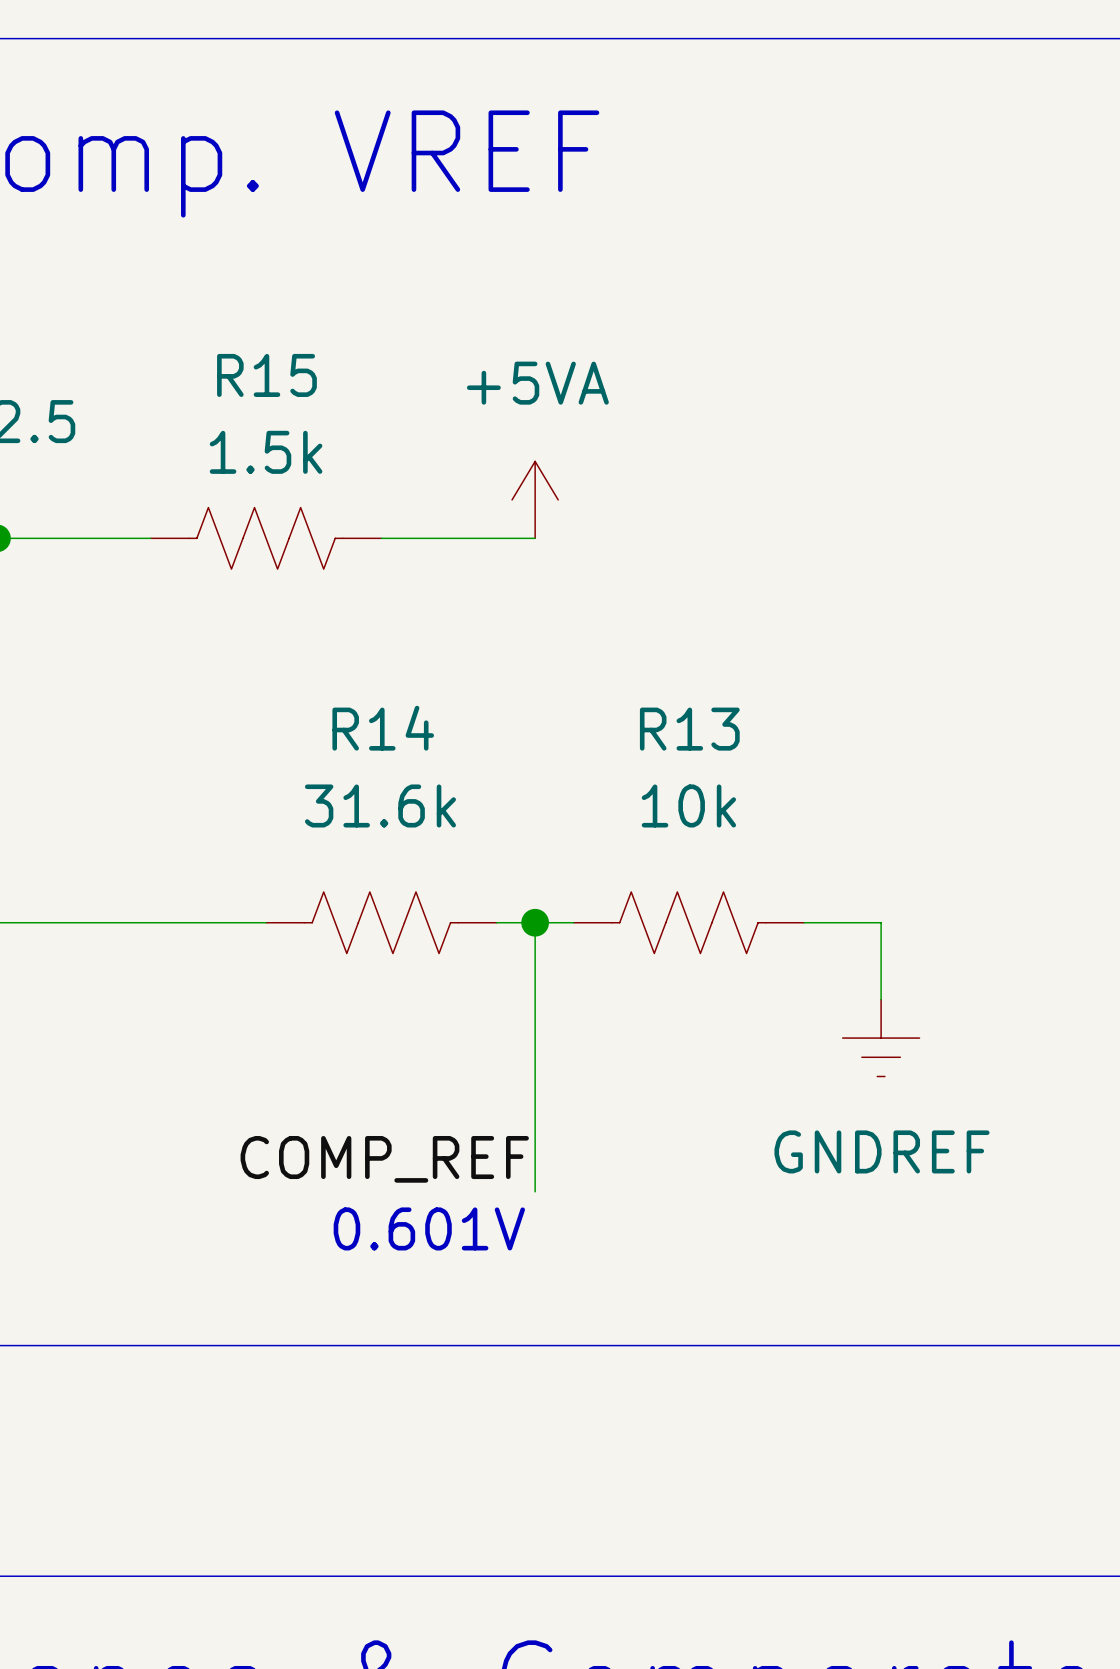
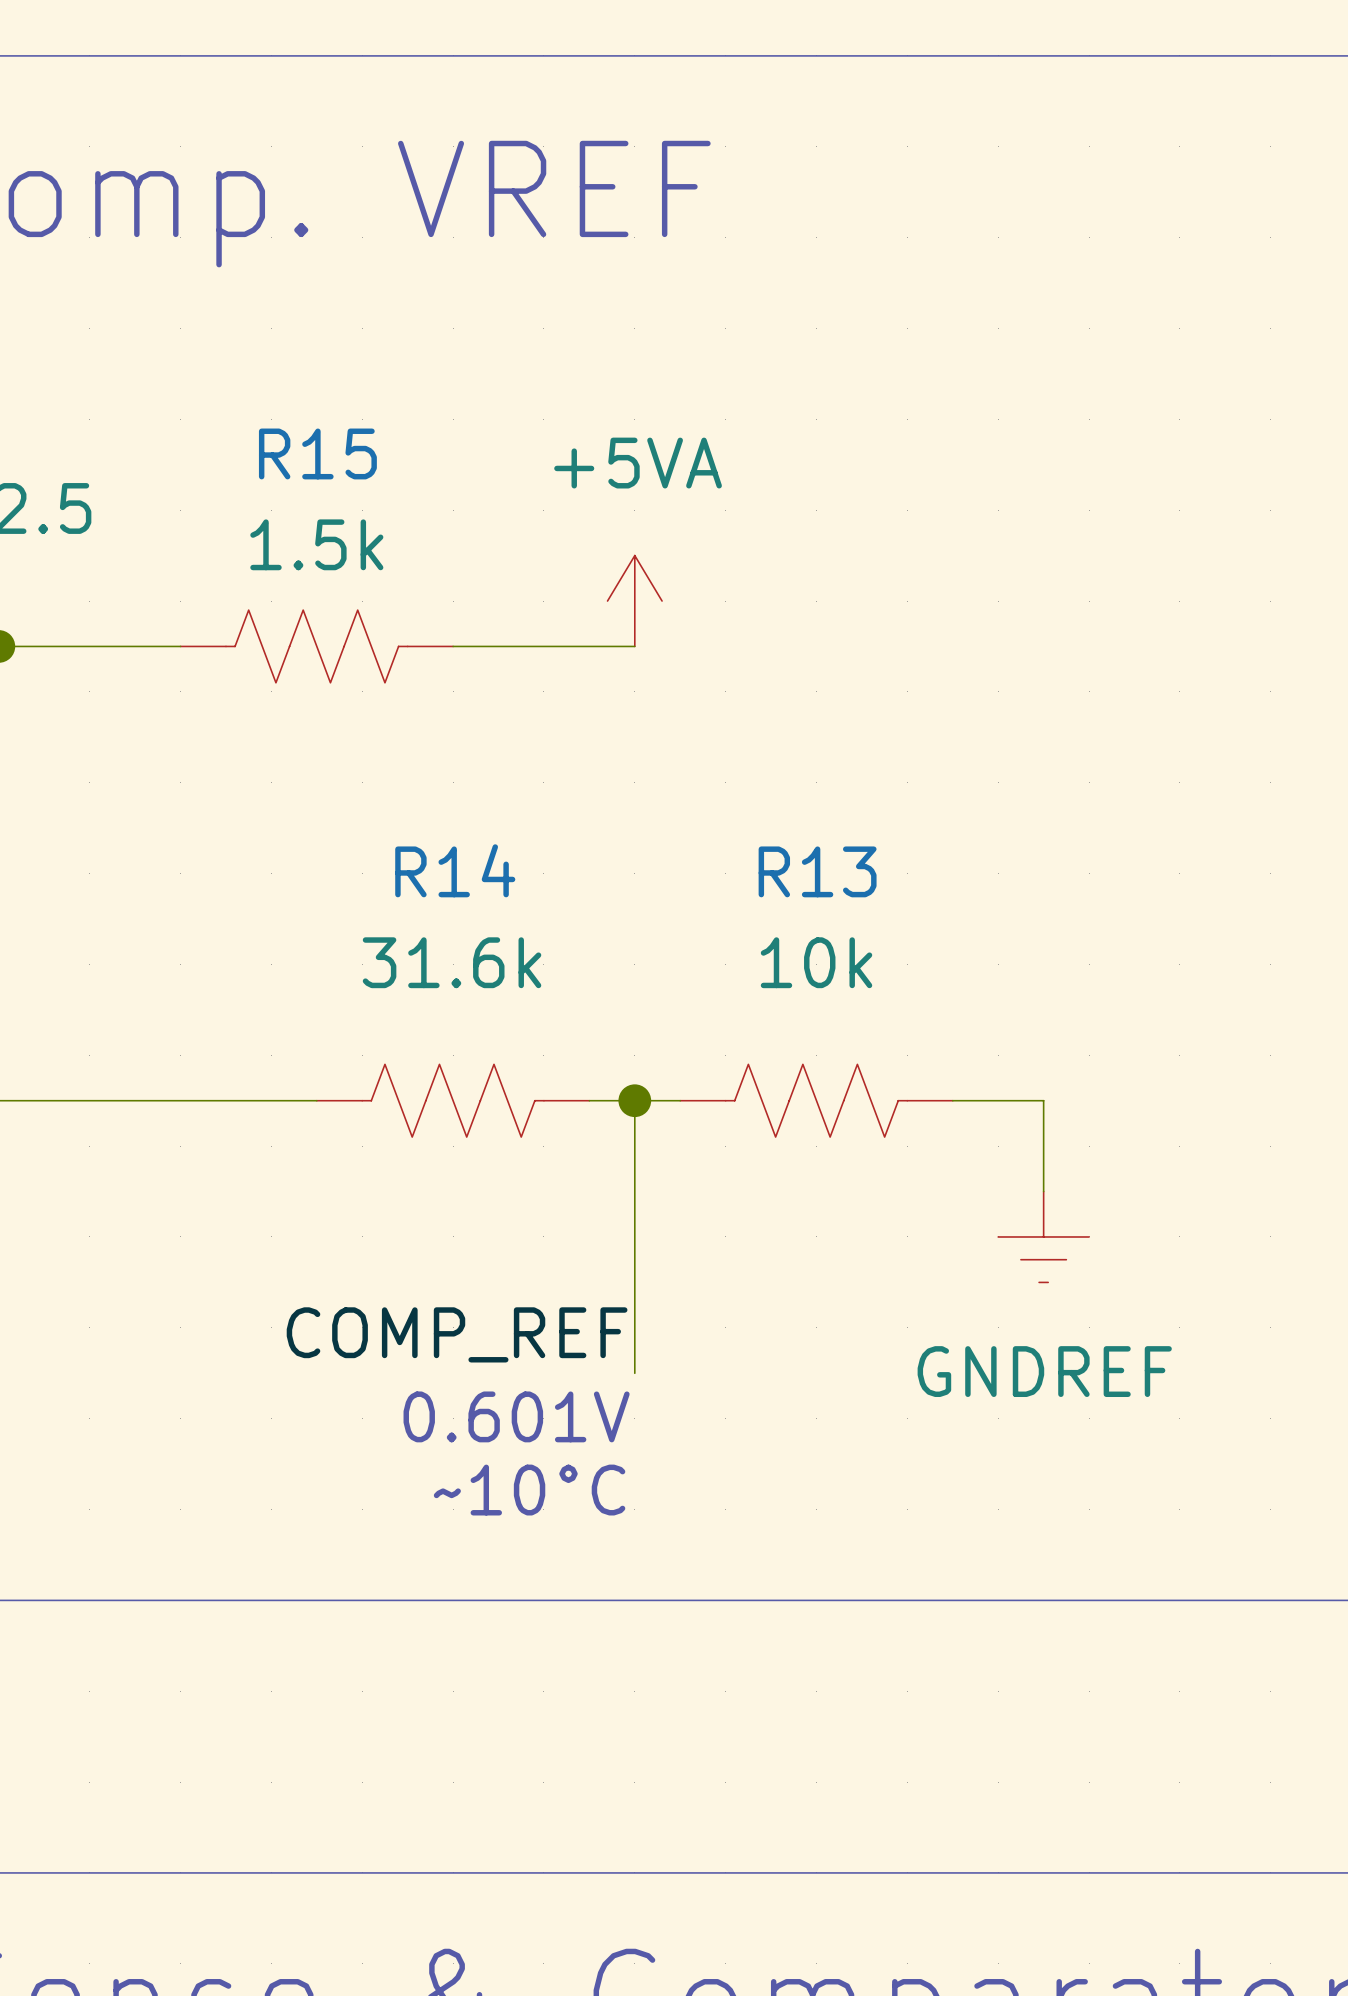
wire: (535, 1153) (535, 1191) -> none
label position: COMP_REF (384, 1159) -> COMP_REF (457, 1334)
text position: 0.601V (429, 1228) -> 0.601V (516, 1416)
text: none -> ~10°C (529, 1490)

